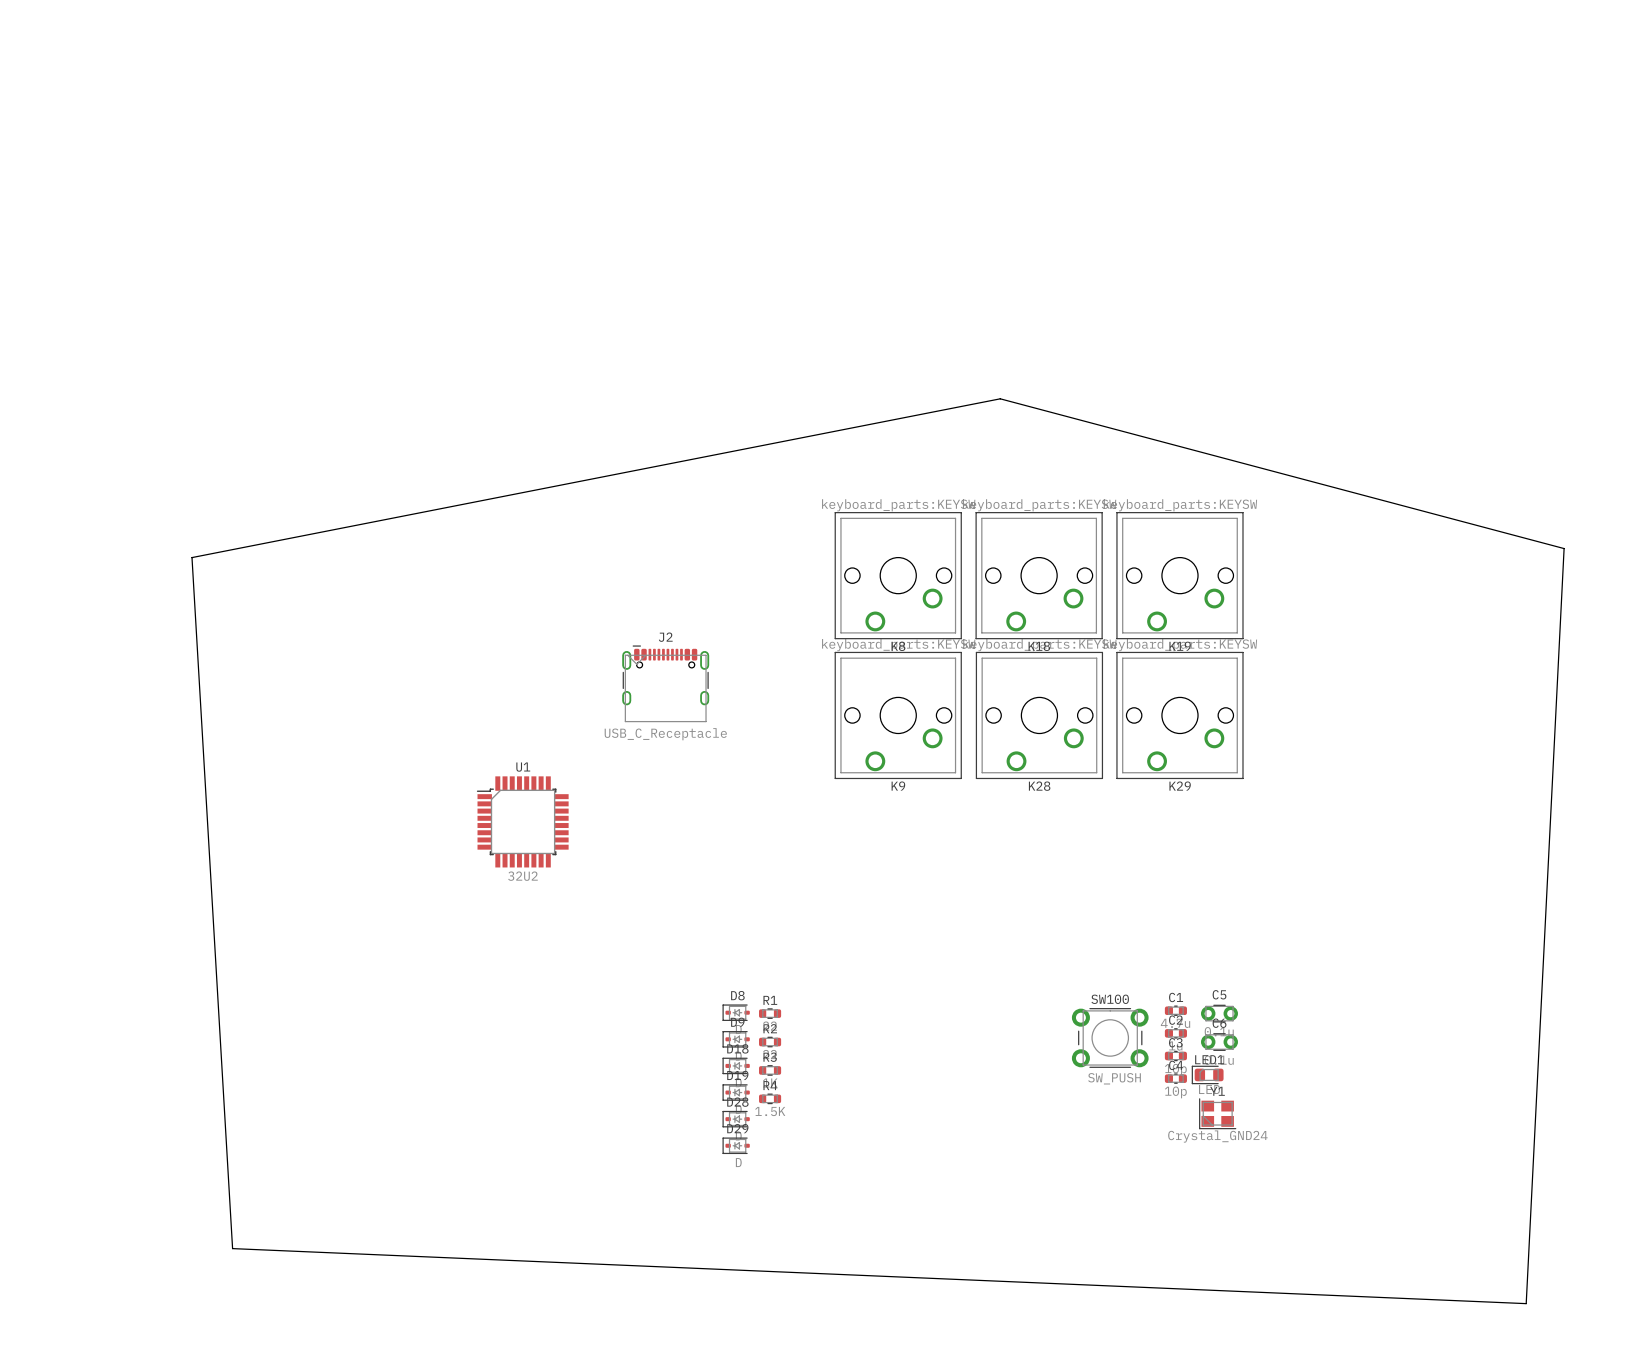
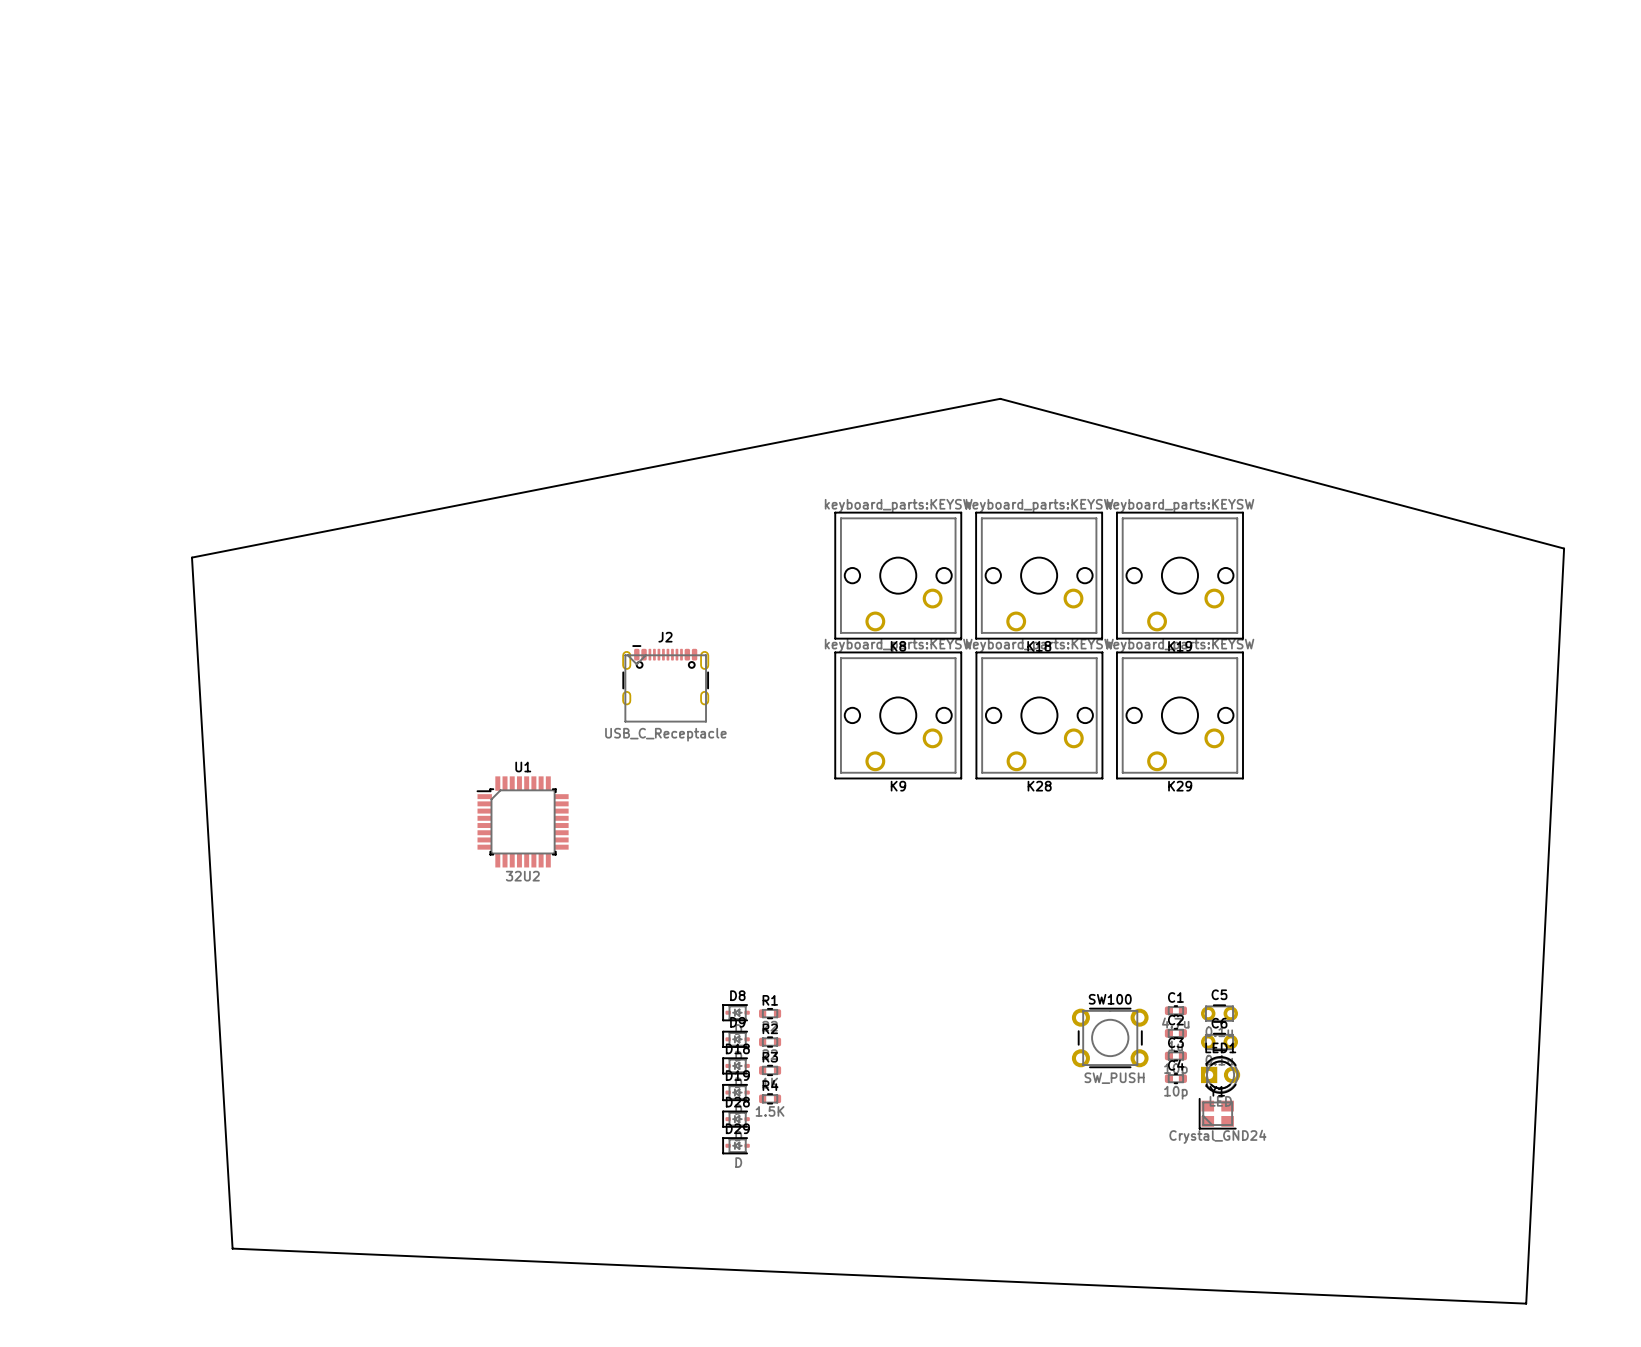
LED1 footprint: [1191, 1065, 1224, 1085] -> [1201, 1056, 1241, 1094]

